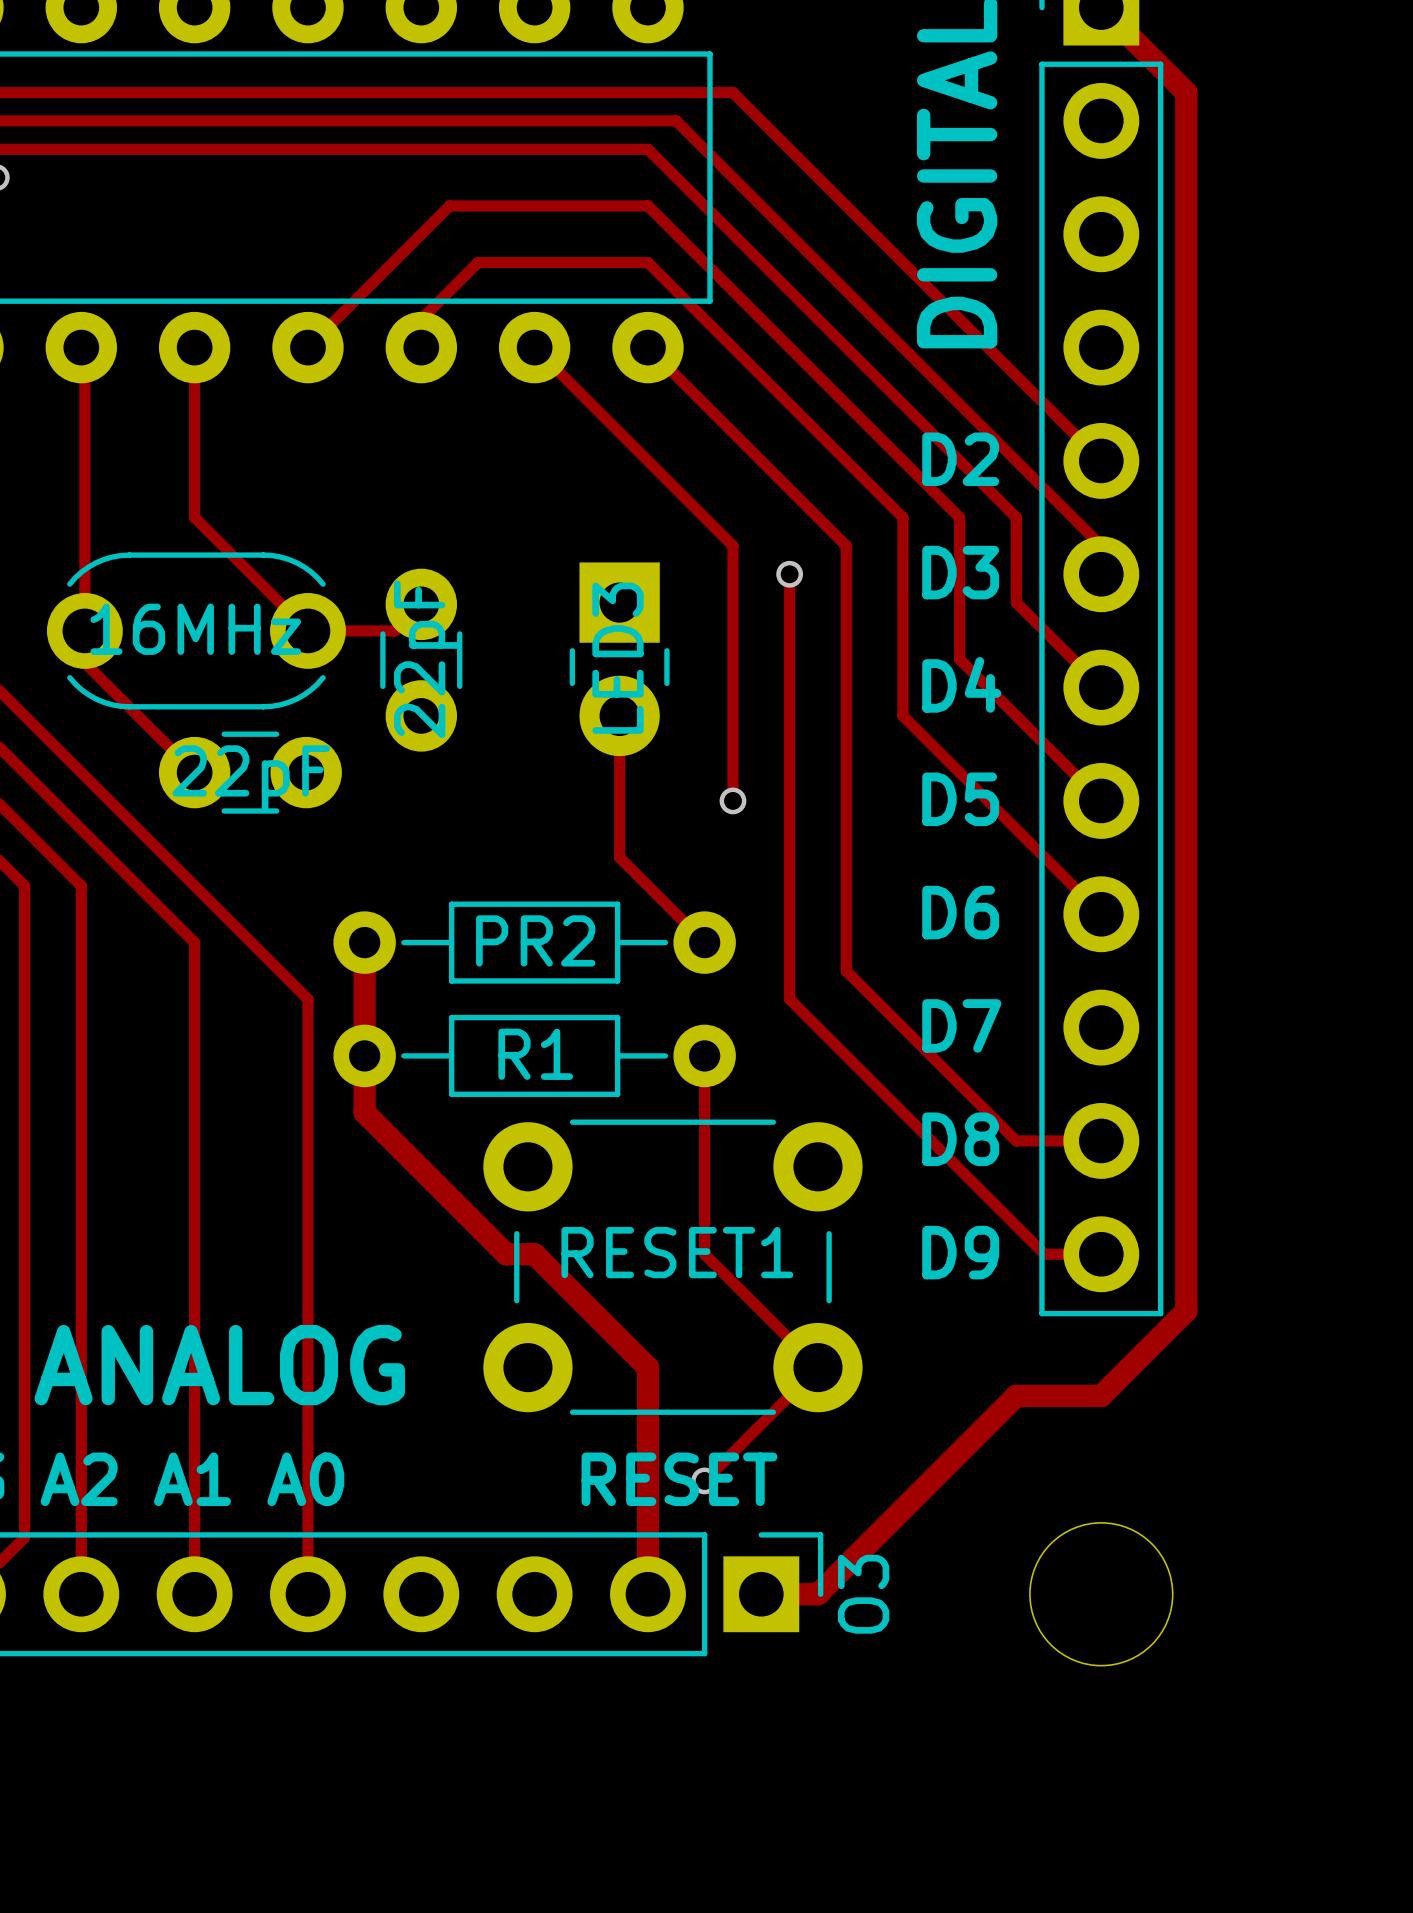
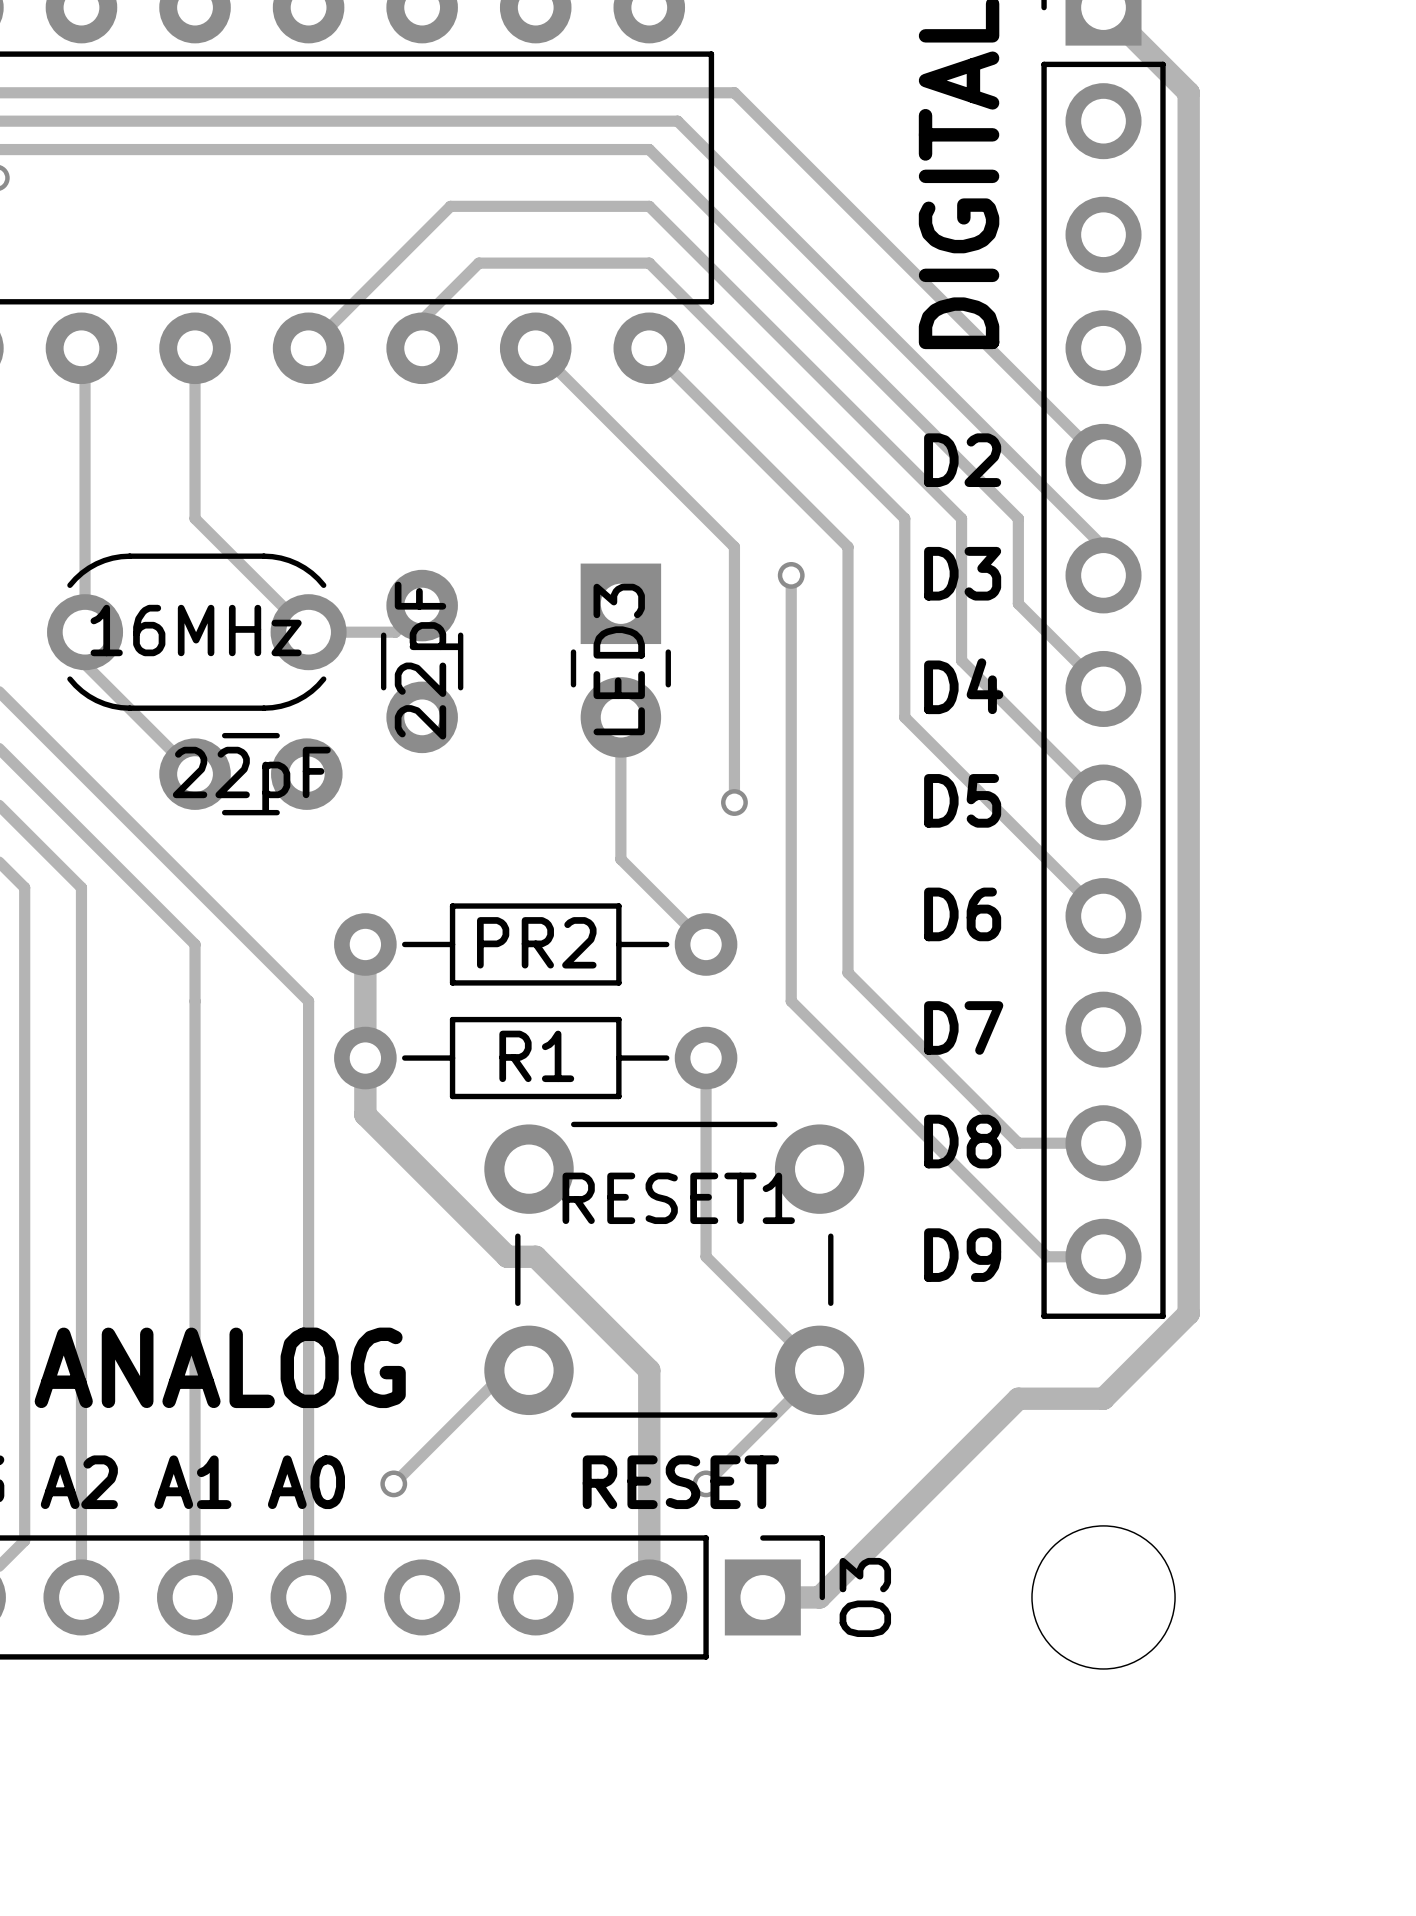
RESET1 name position: RESET1 (677, 1252) -> RESET1 (678, 1198)
track: none -> (507, 1370) (393, 1483)
via: none -> (393, 1483)

